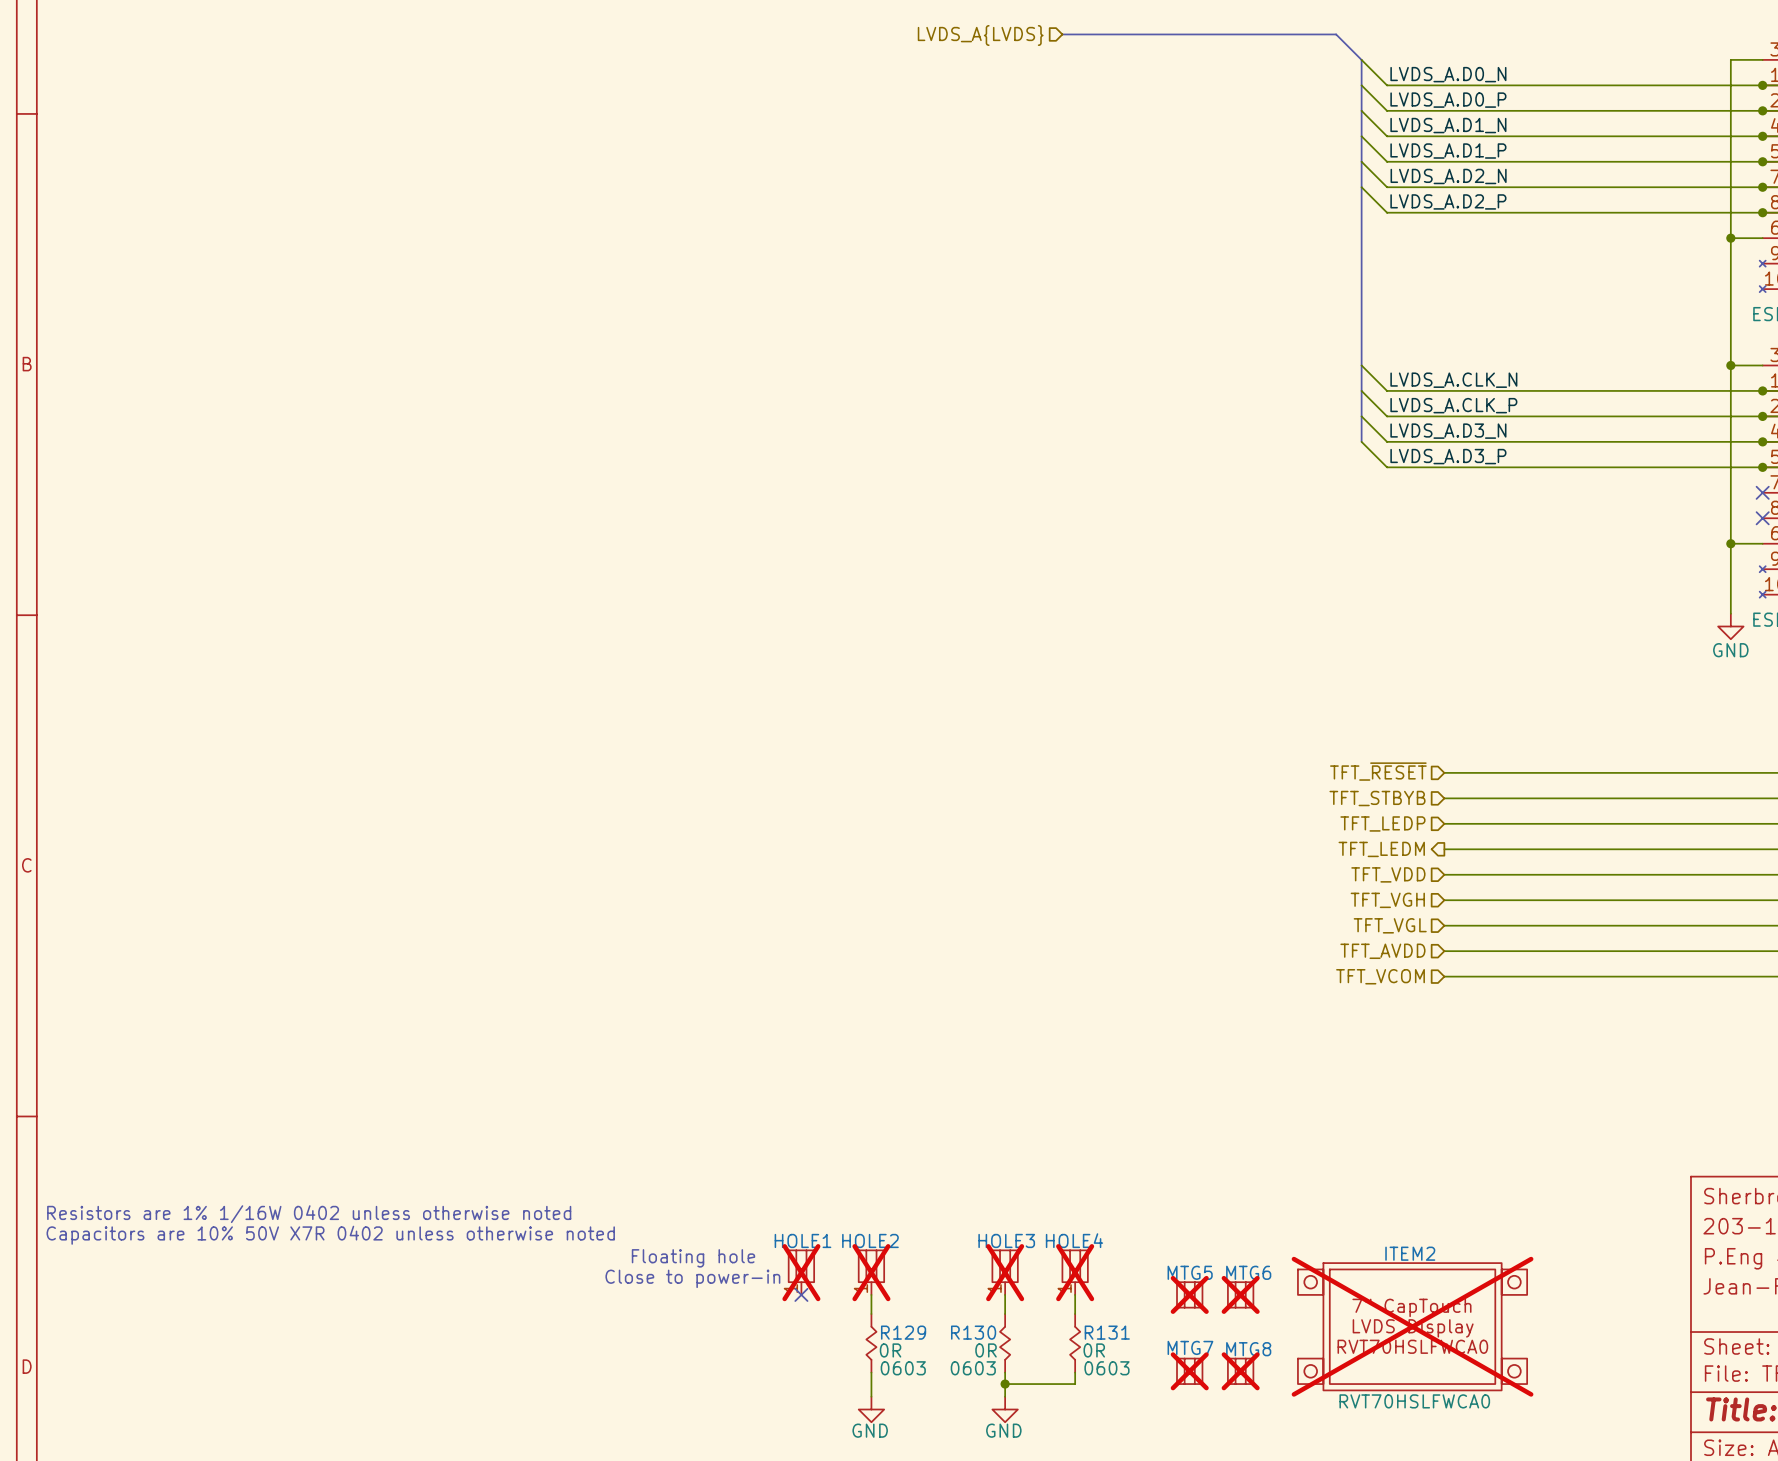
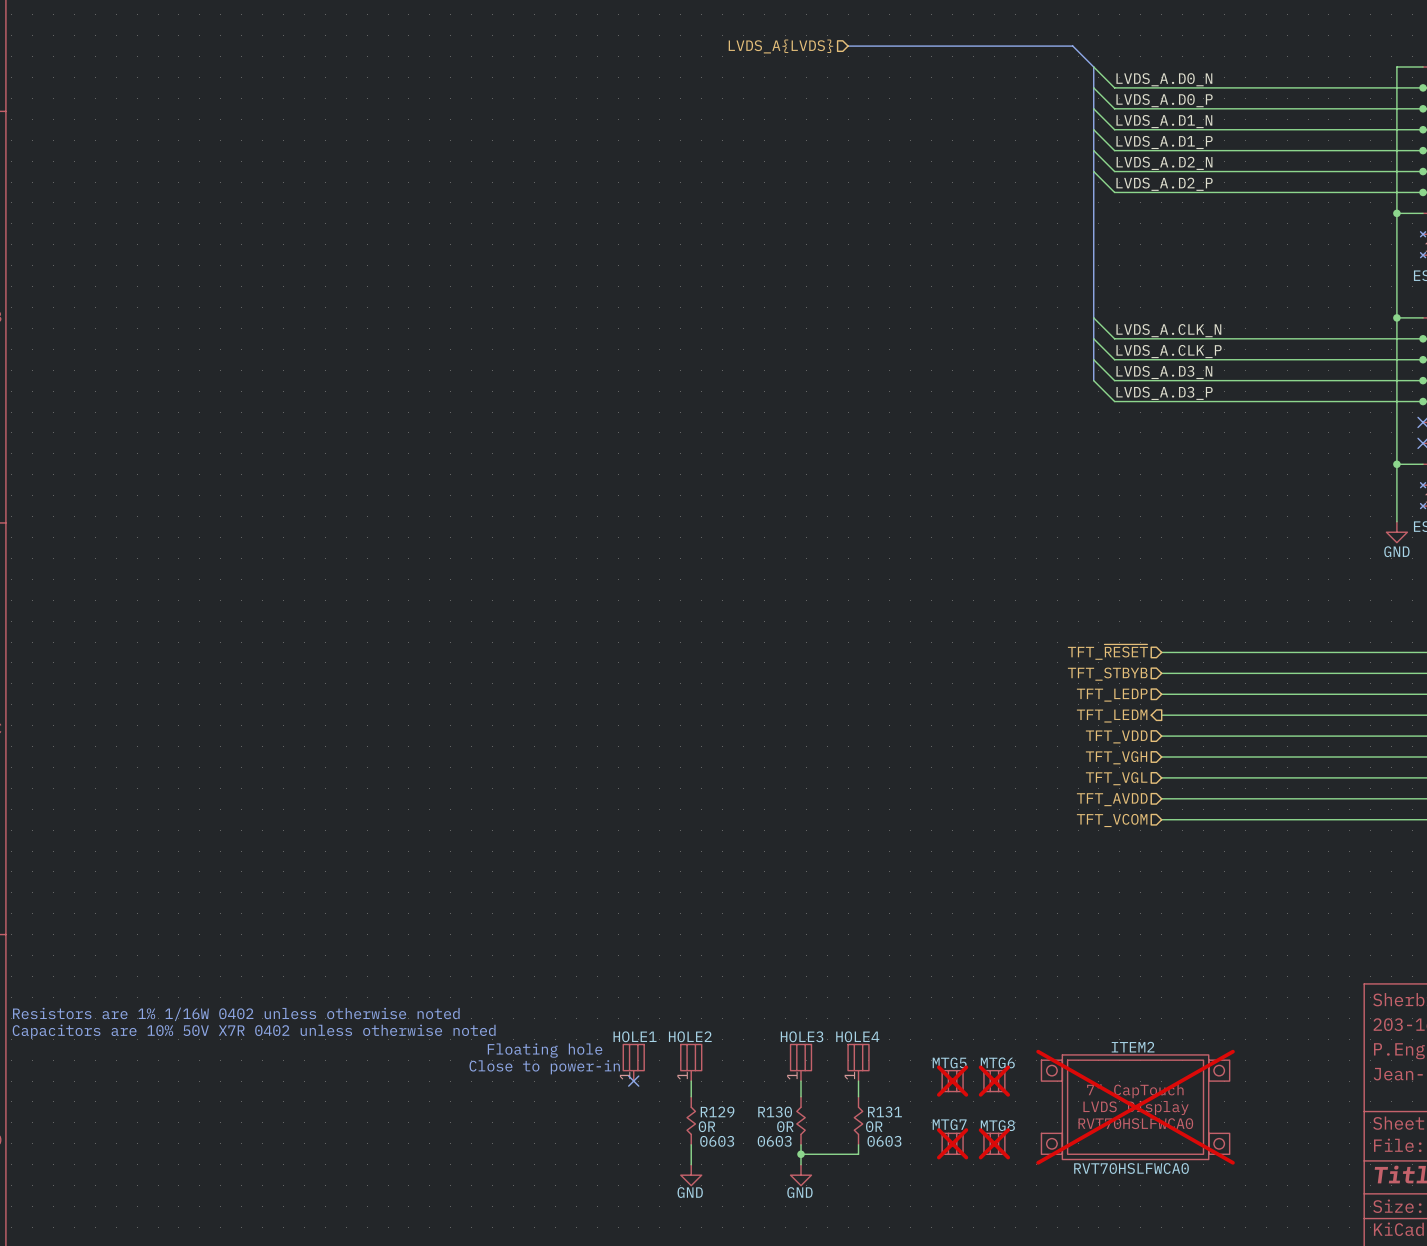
HOLE1 do-not-place cross: (801, 1272) -> none
HOLE2 do-not-place cross: (871, 1272) -> none
HOLE3 do-not-place cross: (1005, 1272) -> none
HOLE4 do-not-place cross: (1075, 1272) -> none

